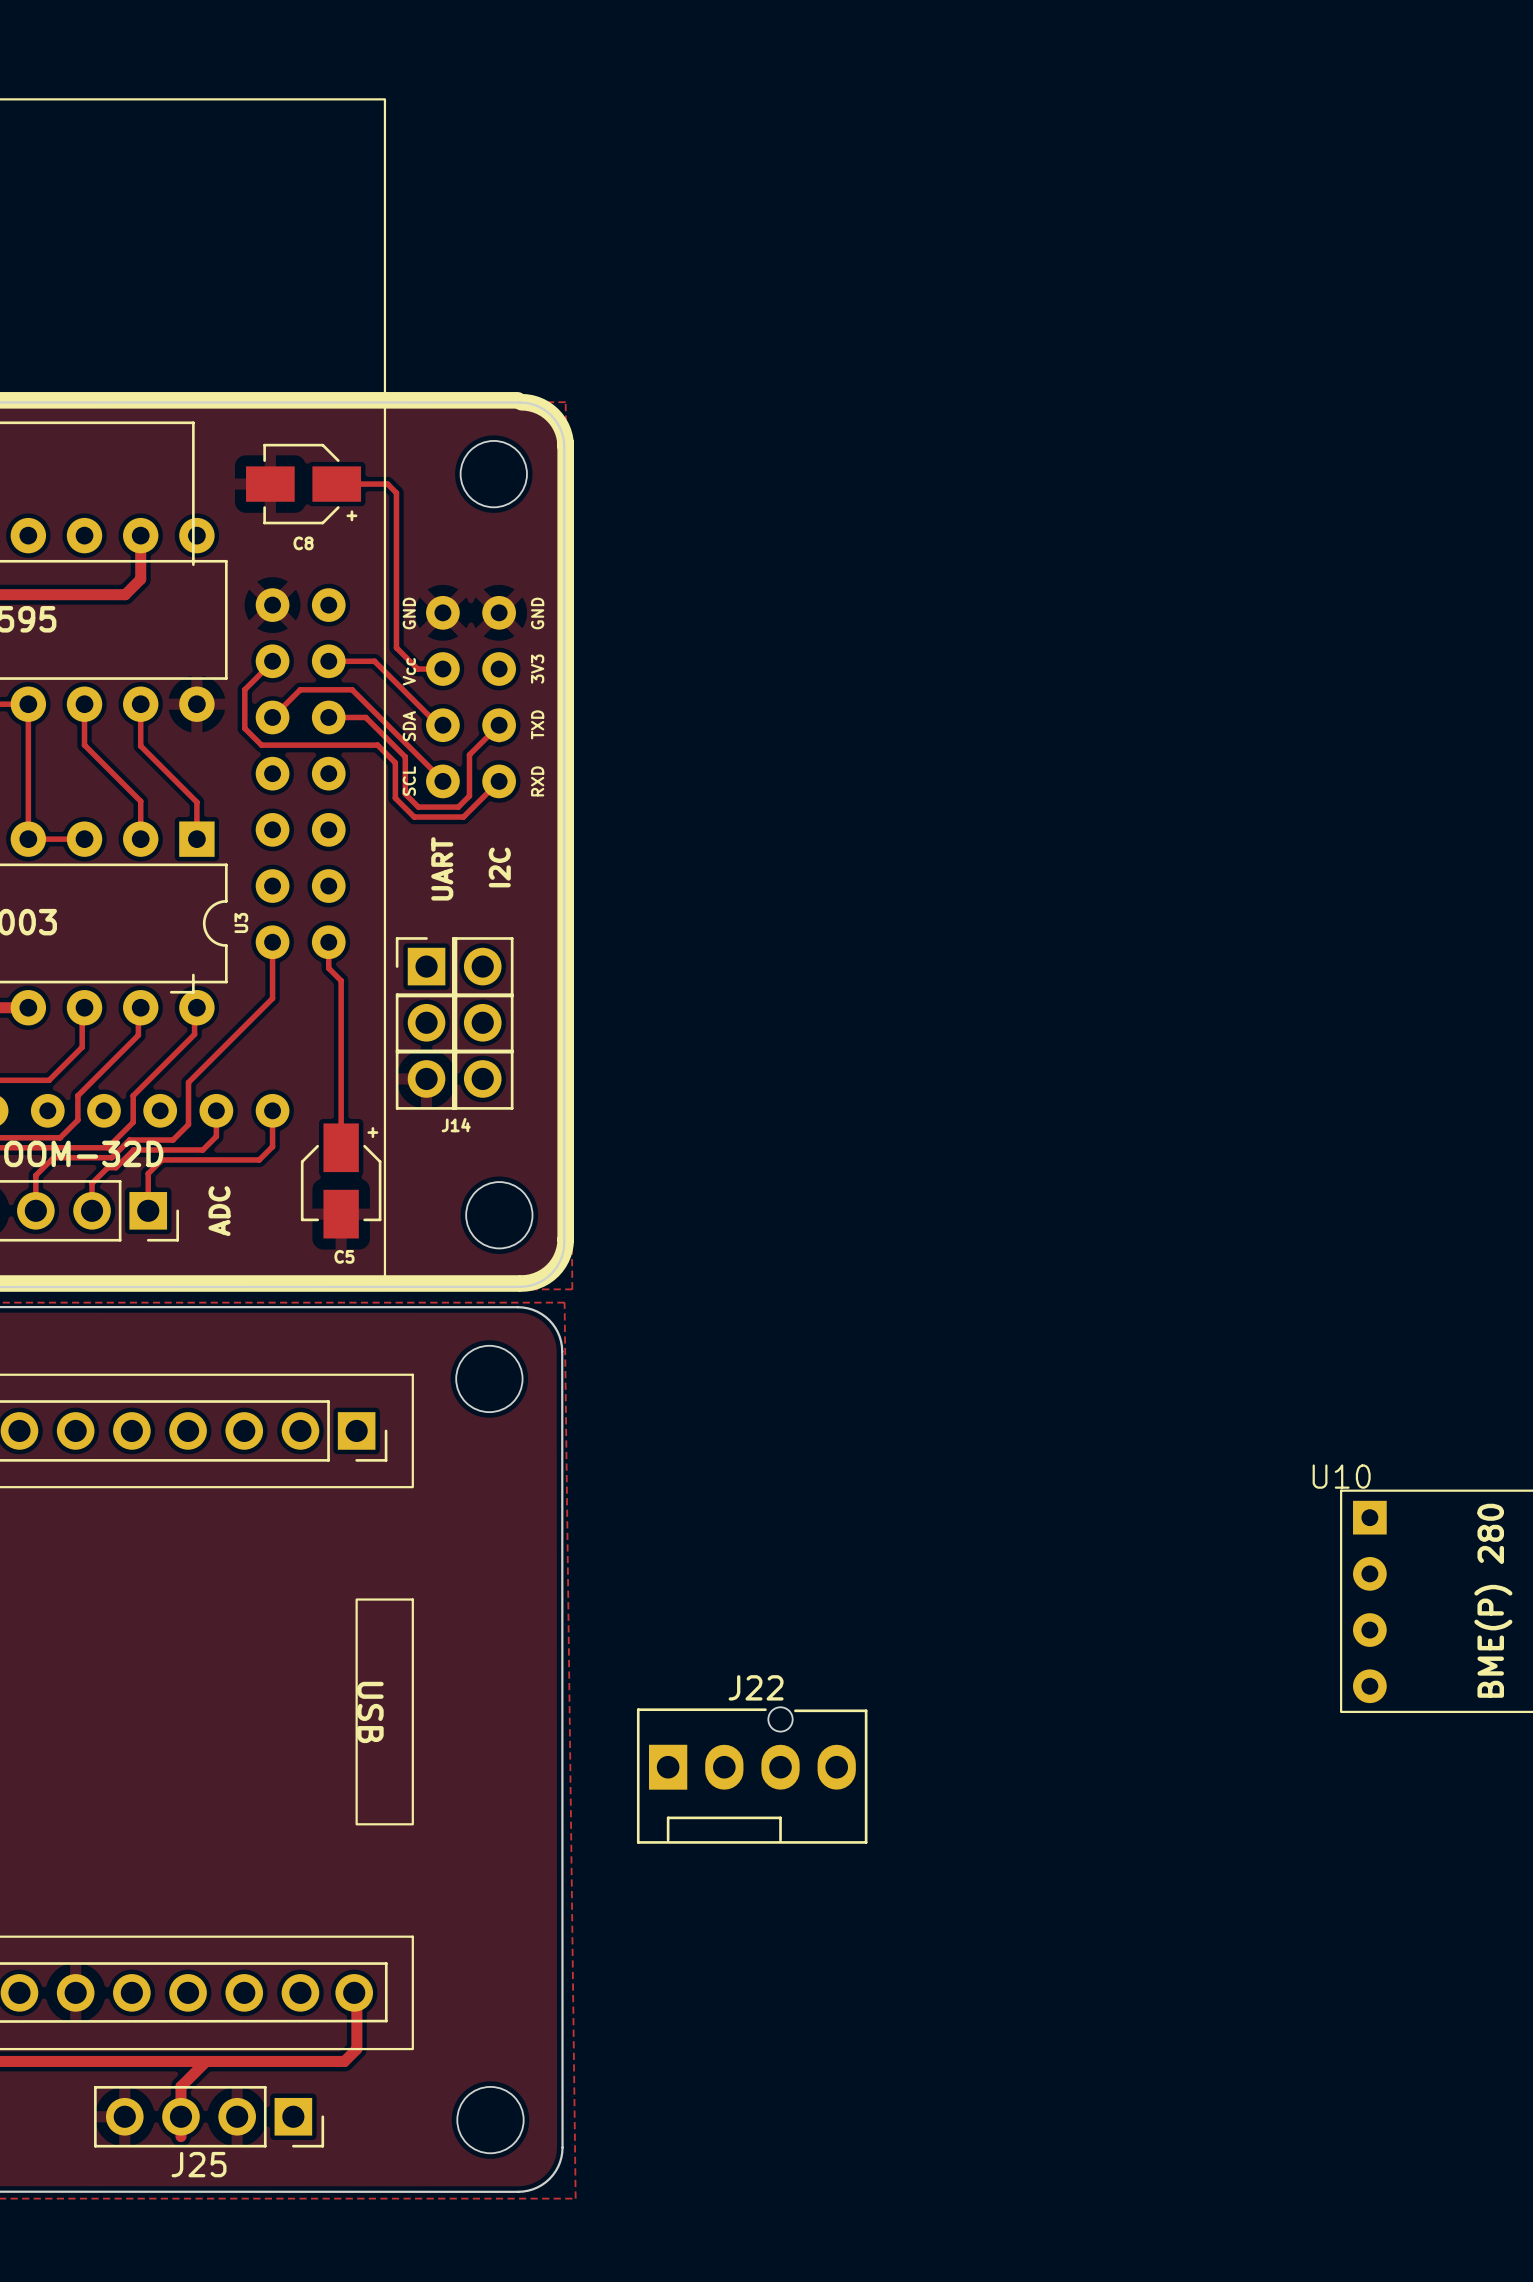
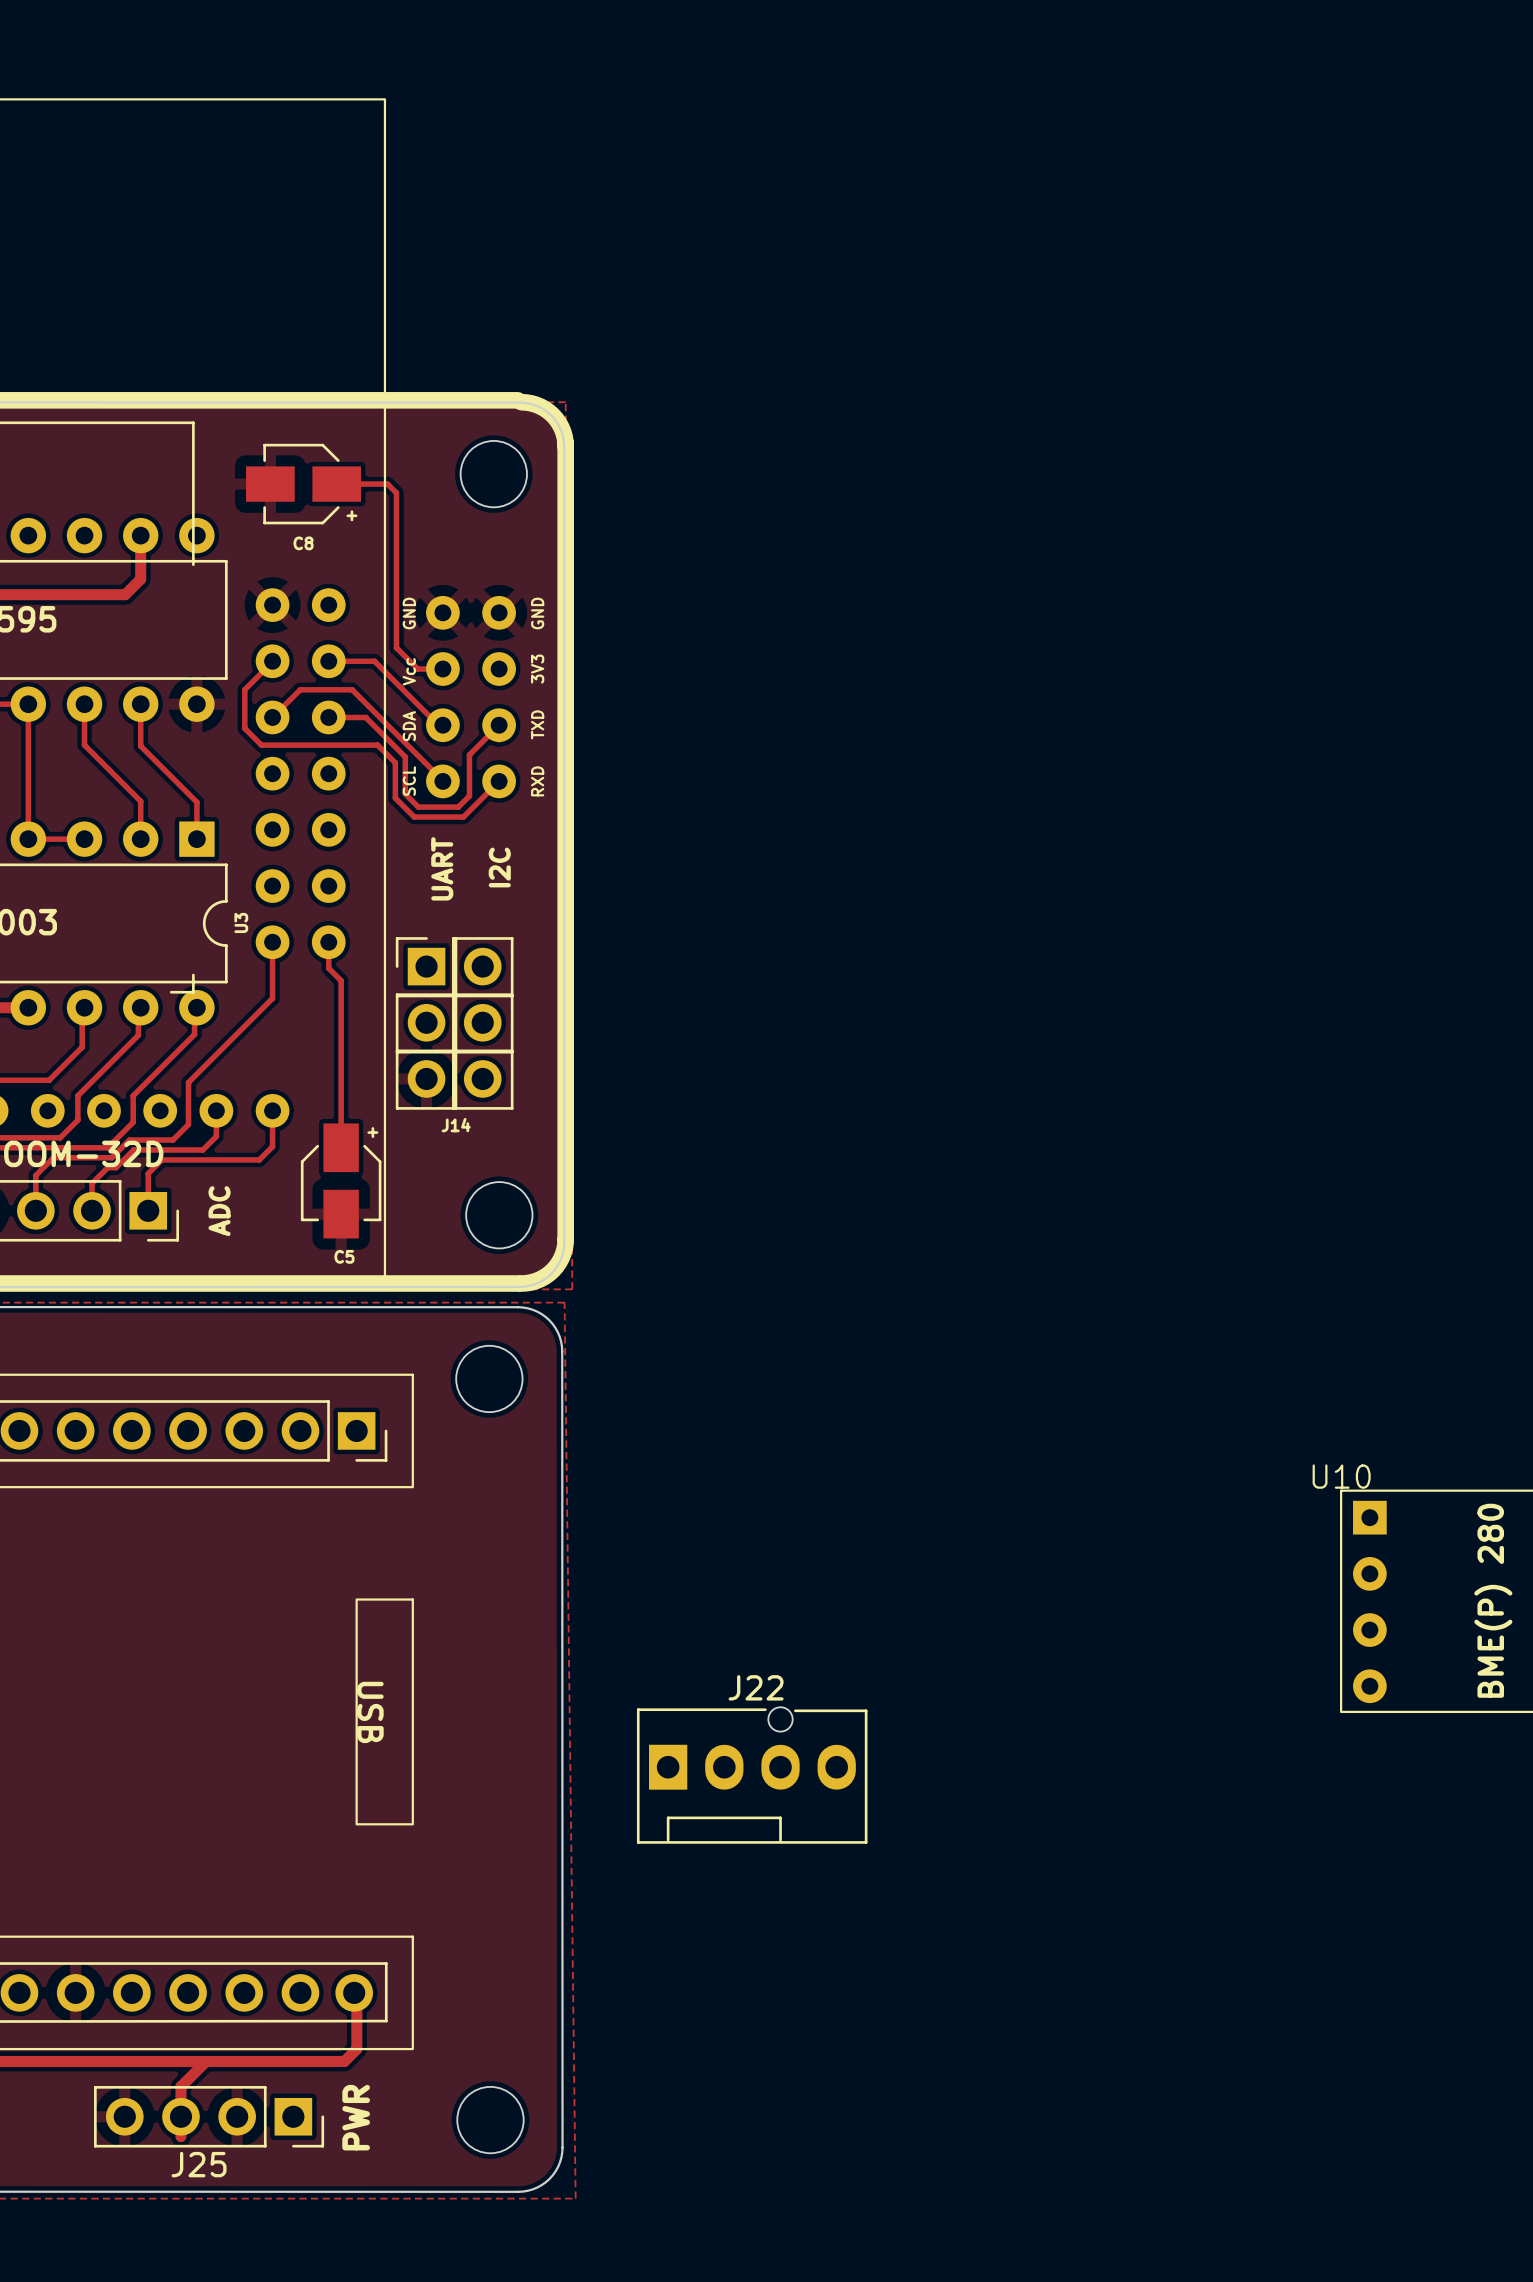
text: none -> PWR (356, 2117)

